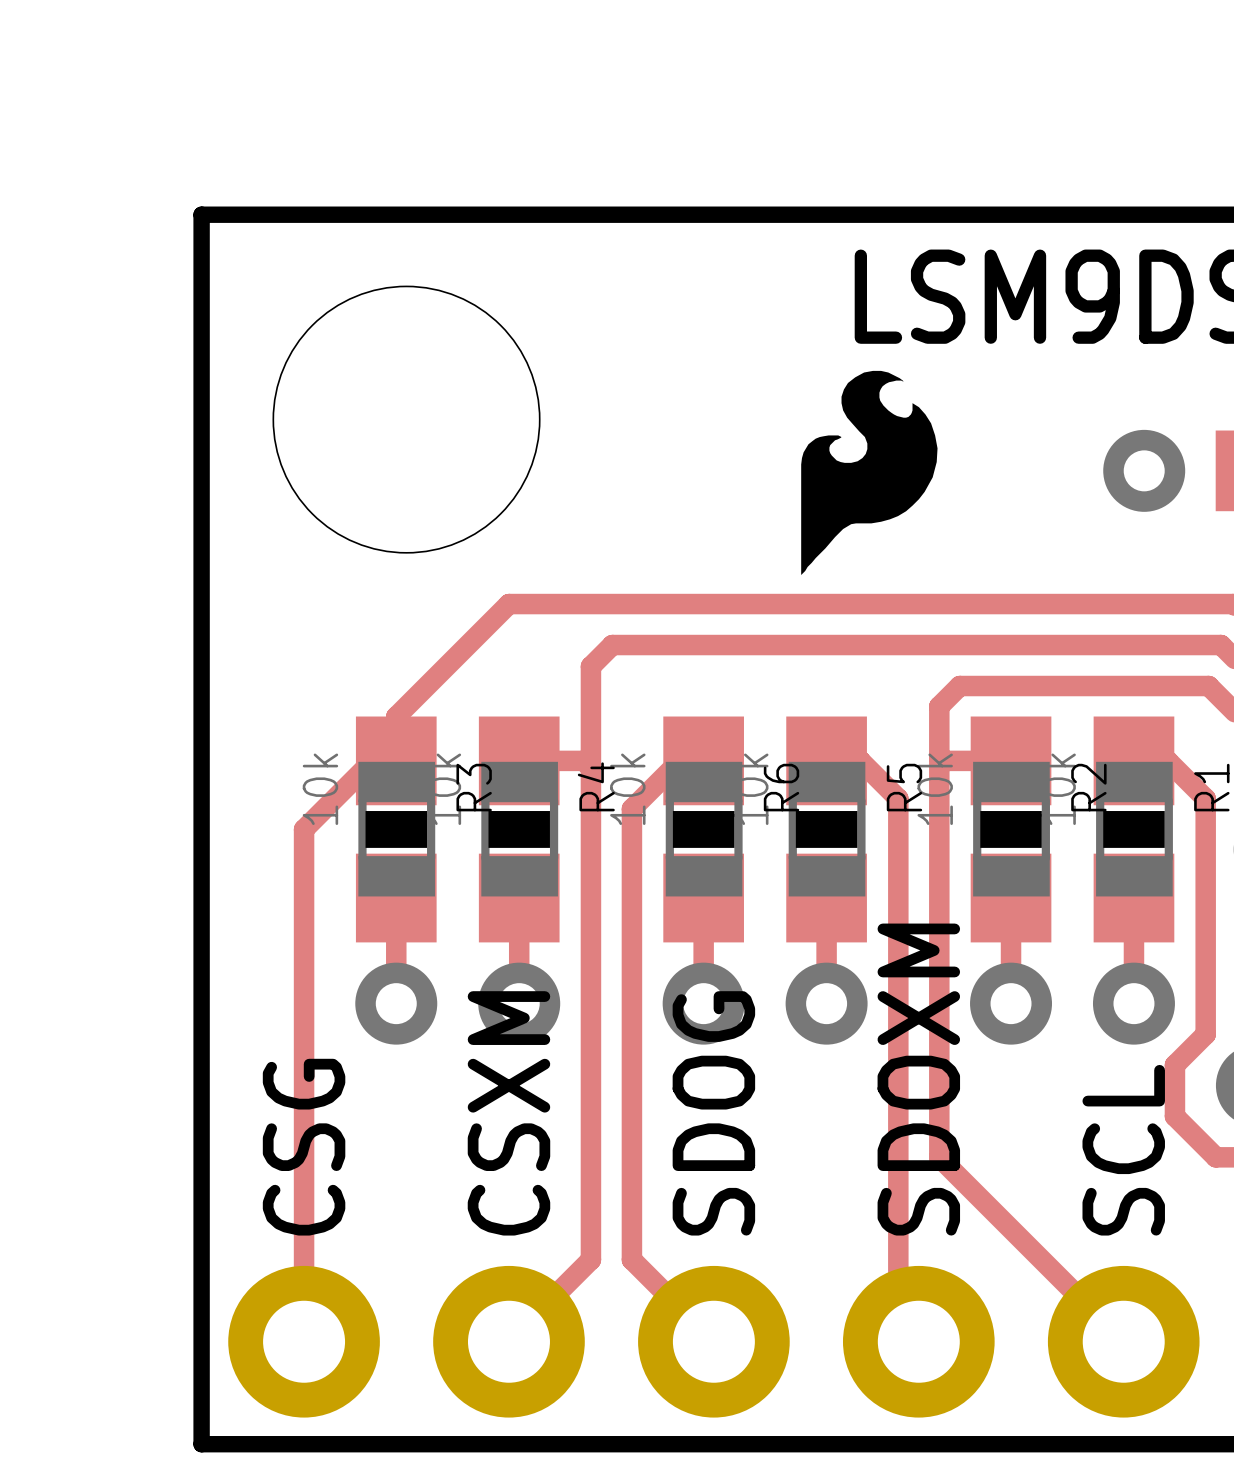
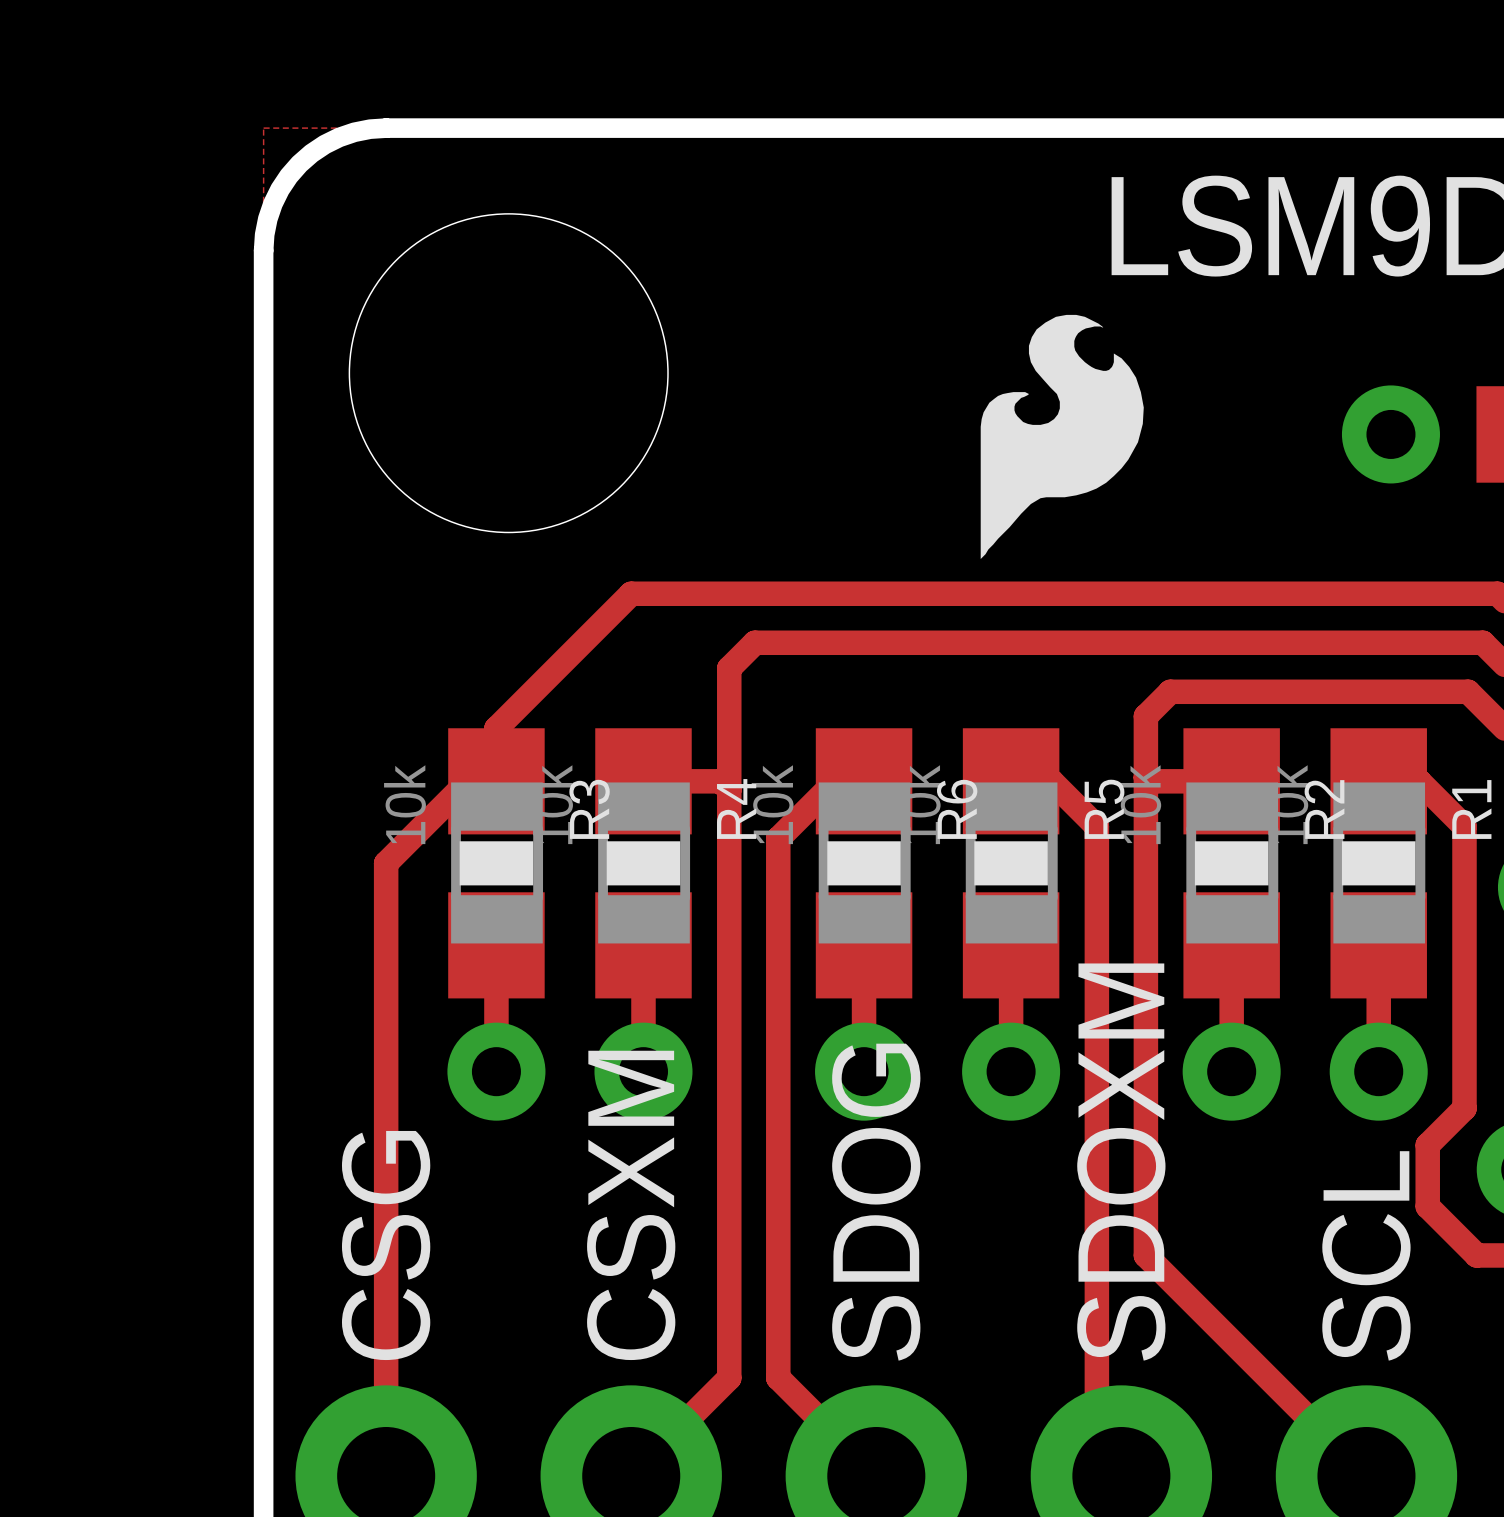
board edge: (304, 214) (201, 214) (201, 317) -> (386, 128) (354, 132) (339, 137) (324, 144) (299, 163) (280, 189) (272, 203) (267, 218) (263, 250)

